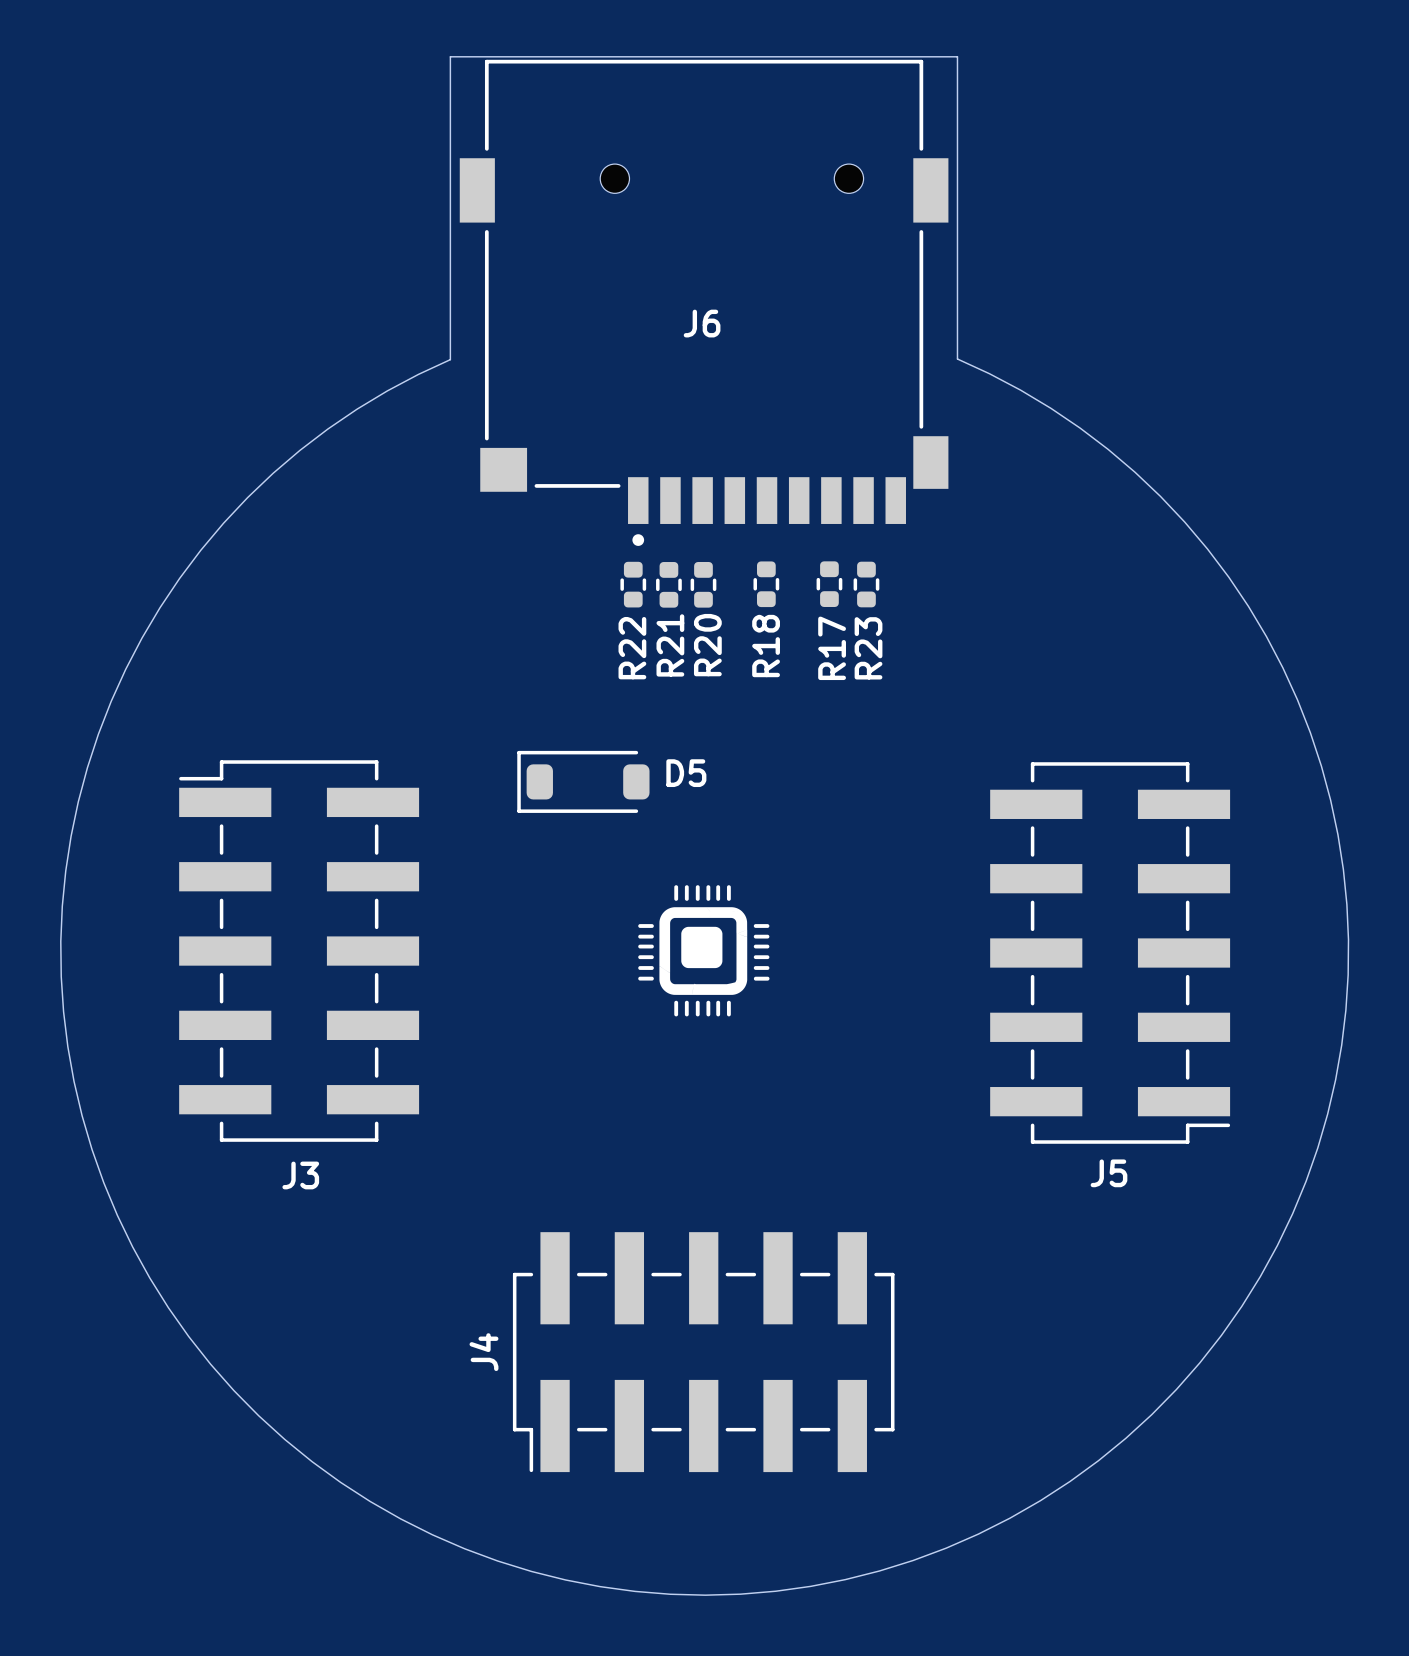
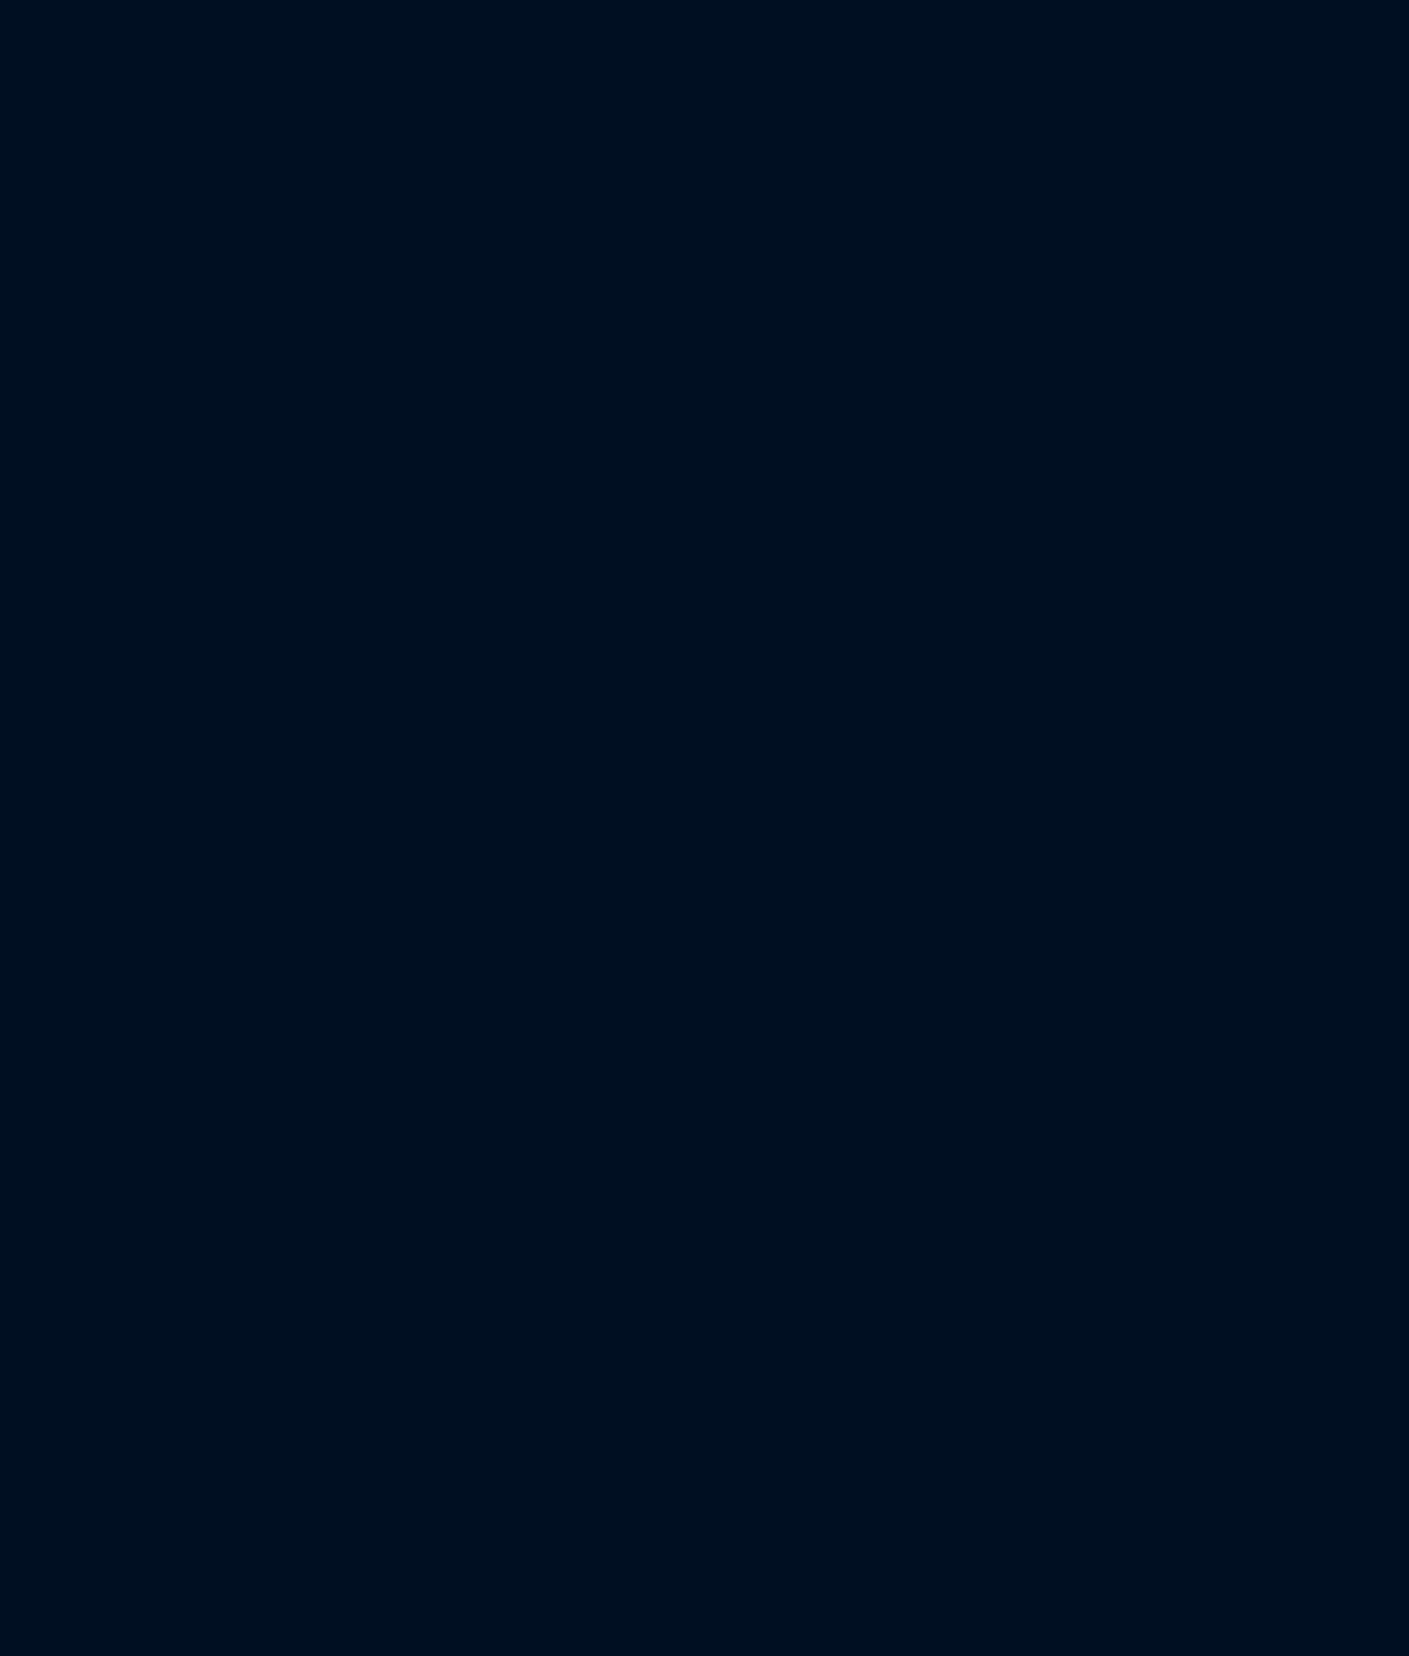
board edge: (450, 56) (450, 359) (418, 374) (357, 409) (299, 450) (247, 497) (200, 550) (160, 607) (125, 669) (98, 734) (78, 801) (71, 836) (65, 871) (60, 941) (61, 976) (67, 1046) (82, 1115) (103, 1182) (132, 1247) (149, 1277) (188, 1336) (233, 1390) (284, 1439) (340, 1482) (400, 1518) (464, 1548) (531, 1571) (600, 1586) (635, 1591) (670, 1594) (740, 1594) (810, 1586) (879, 1570) (946, 1548) (1009, 1518) (1040, 1500) (1098, 1460) (1125, 1438) (1176, 1389) (1221, 1335) (1260, 1276) (1277, 1245) (1306, 1181) (1327, 1114) (1341, 1045) (1348, 974) (1346, 904) (1337, 834) (1321, 766) (1297, 699) (1266, 636) (1228, 577) (1184, 522) (1134, 472) (1080, 428) (1020, 390) (957, 359) (957, 56) (450, 56) -> none
J6: (704, 302) -> none
R22: (633, 584) -> none
R21: (668, 584) -> none
R20: (703, 584) -> none
R18: (766, 584) -> none
R17: (829, 584) -> none
R23: (866, 584) -> none
D5: (583, 781) -> none
drawing: [638, 885, 770, 1017] -> none
J3: (299, 951) -> none
J5: (1110, 953) -> none
J4: (703, 1352) -> none

